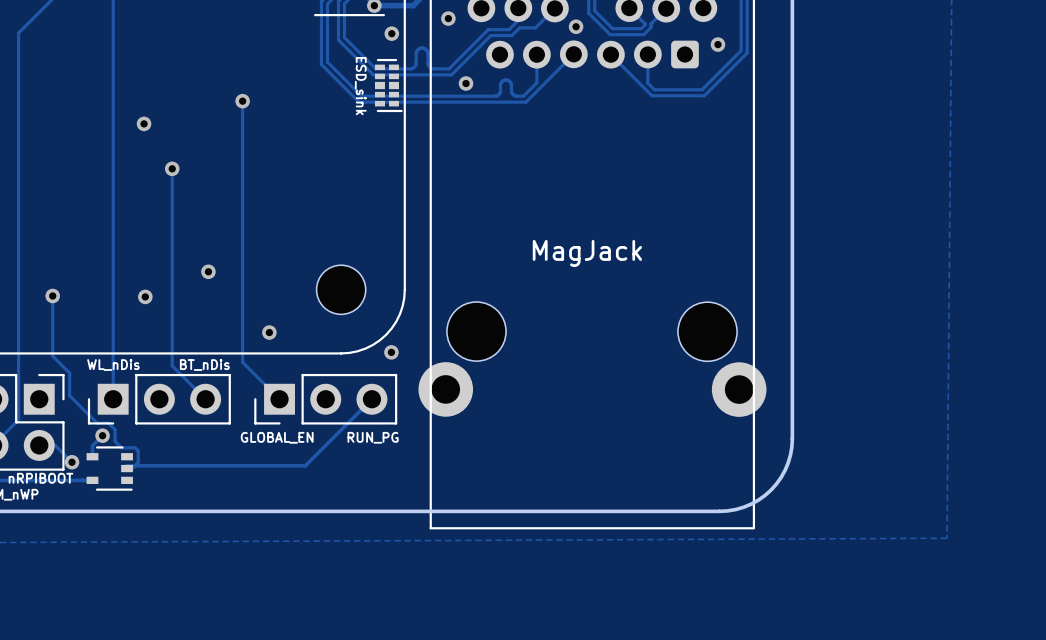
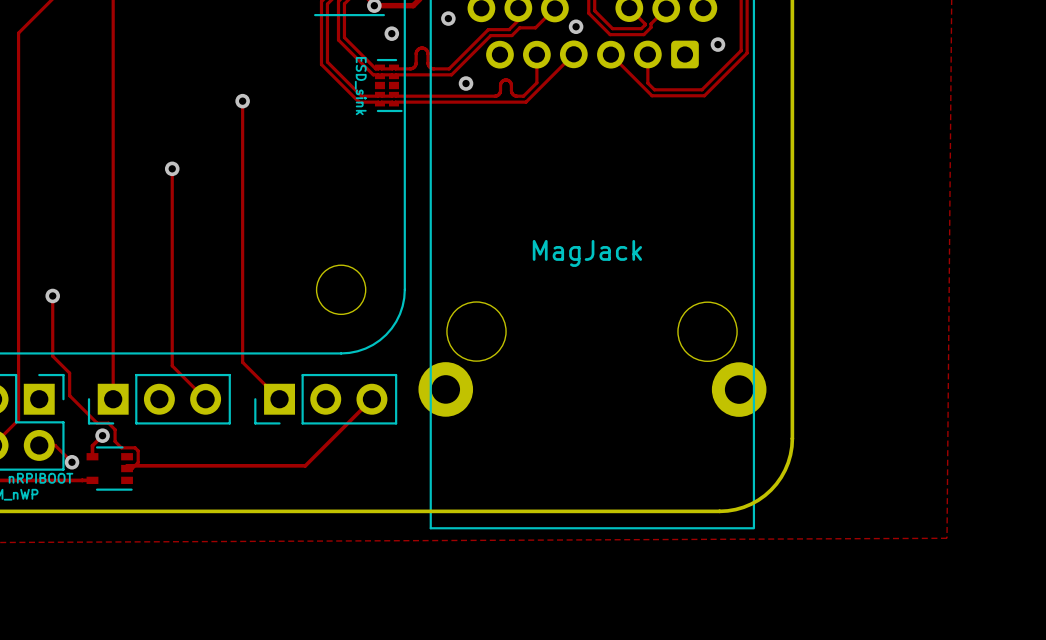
via: (144, 123) -> none
via: (208, 271) -> none
via: (145, 296) -> none
via: (269, 332) -> none
via: (391, 352) -> none
text: WL_nDis (113, 365) -> none
text: BT_nDis (204, 365) -> none
text: GLOBAL_EN (277, 437) -> none
text: RUN_PG (373, 437) -> none

